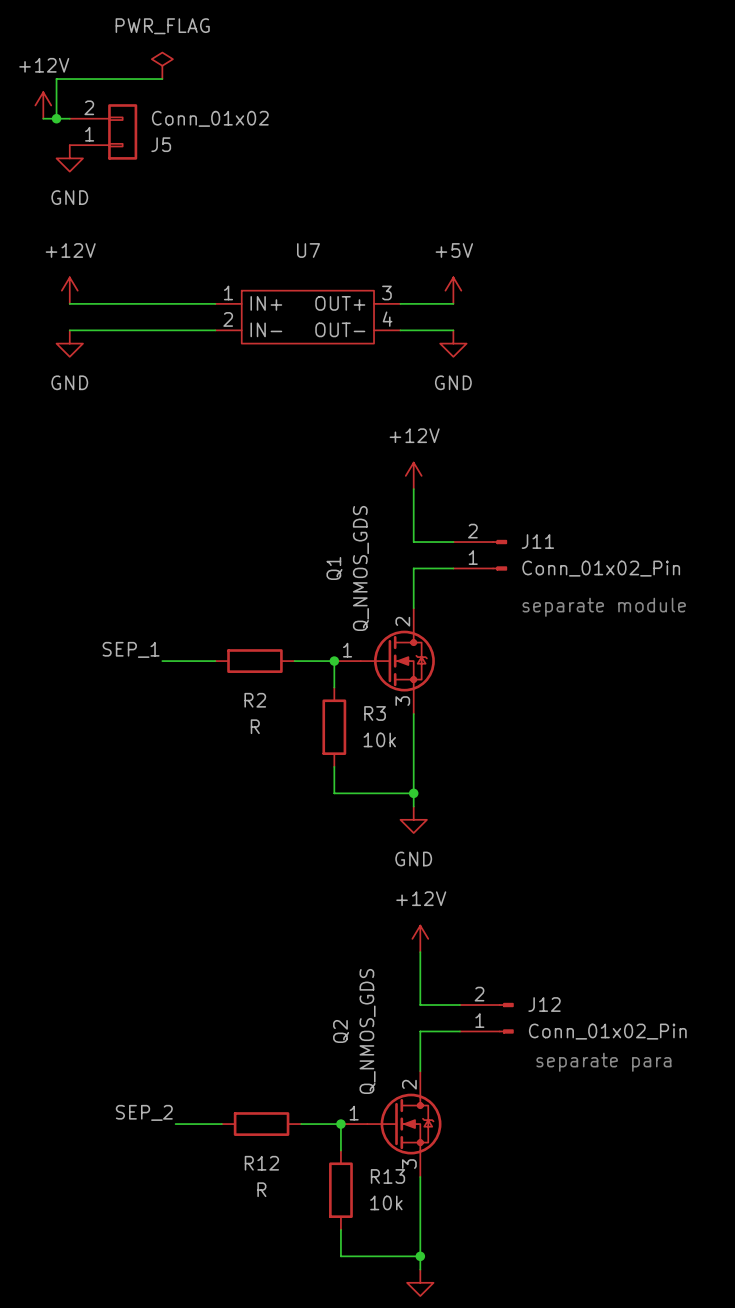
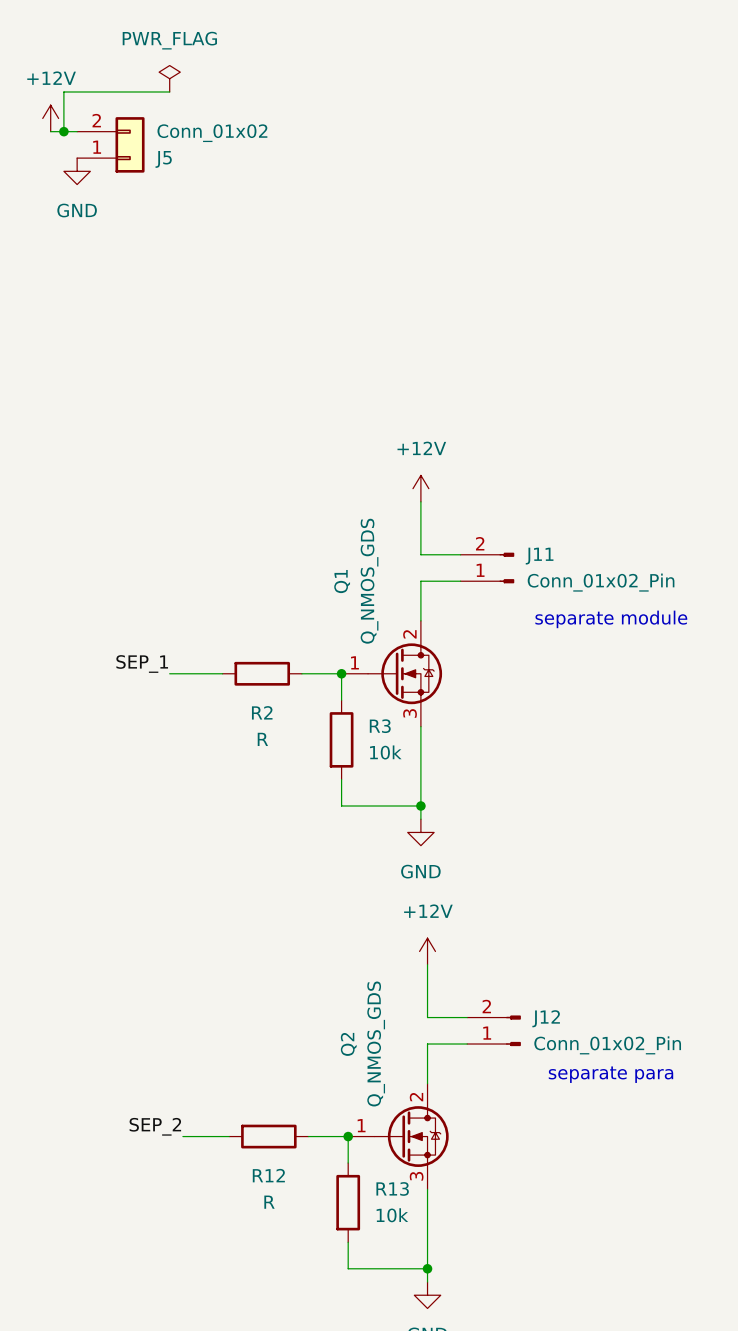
power symbol: +12V (69, 290) -> none
power symbol: +5V (453, 290) -> none
wire: (69, 303) (215, 303) -> none
wire: (400, 303) (453, 303) -> none
U7: (307, 317) -> none
wire: (69, 330) (215, 330) -> none
wire: (400, 330) (453, 330) -> none
power symbol: GND (69, 343) -> none
power symbol: GND (453, 343) -> none

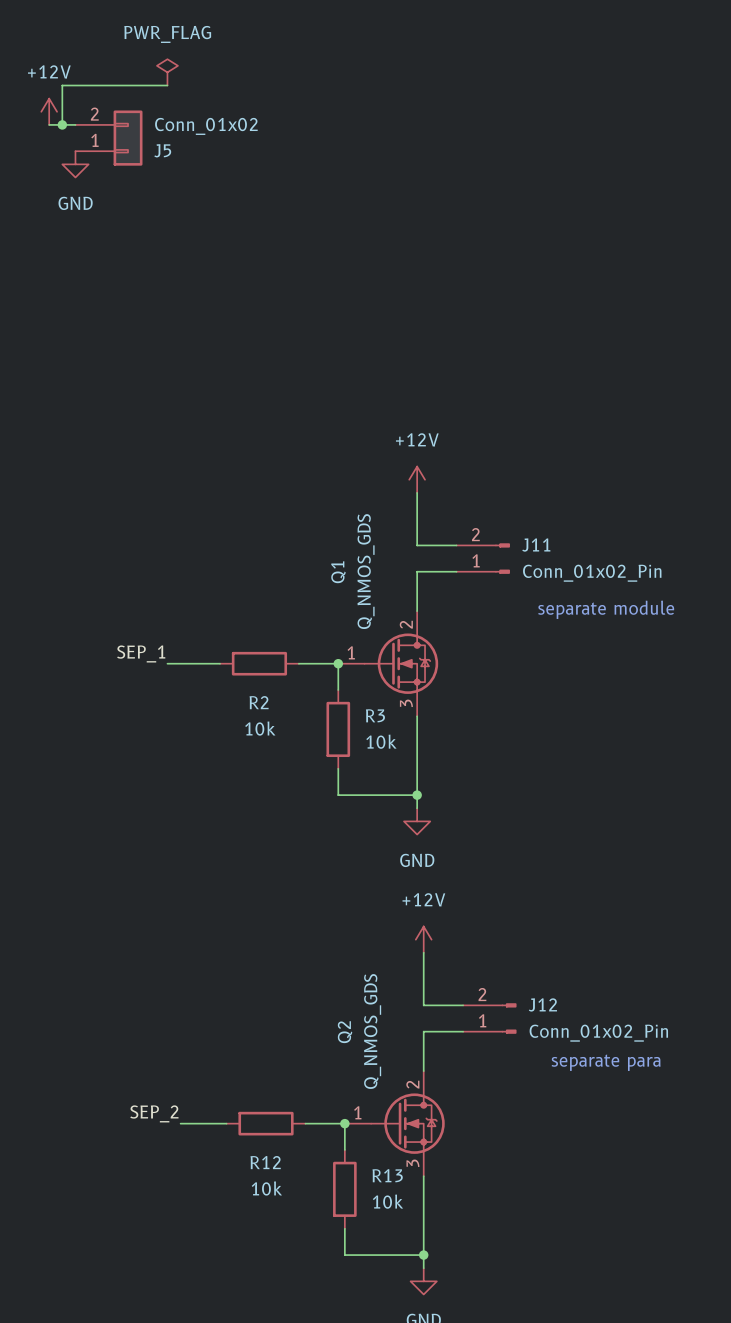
R2 value: R (262, 739) -> 10k (260, 728)
R12 value: R (269, 1202) -> 10k (266, 1188)

